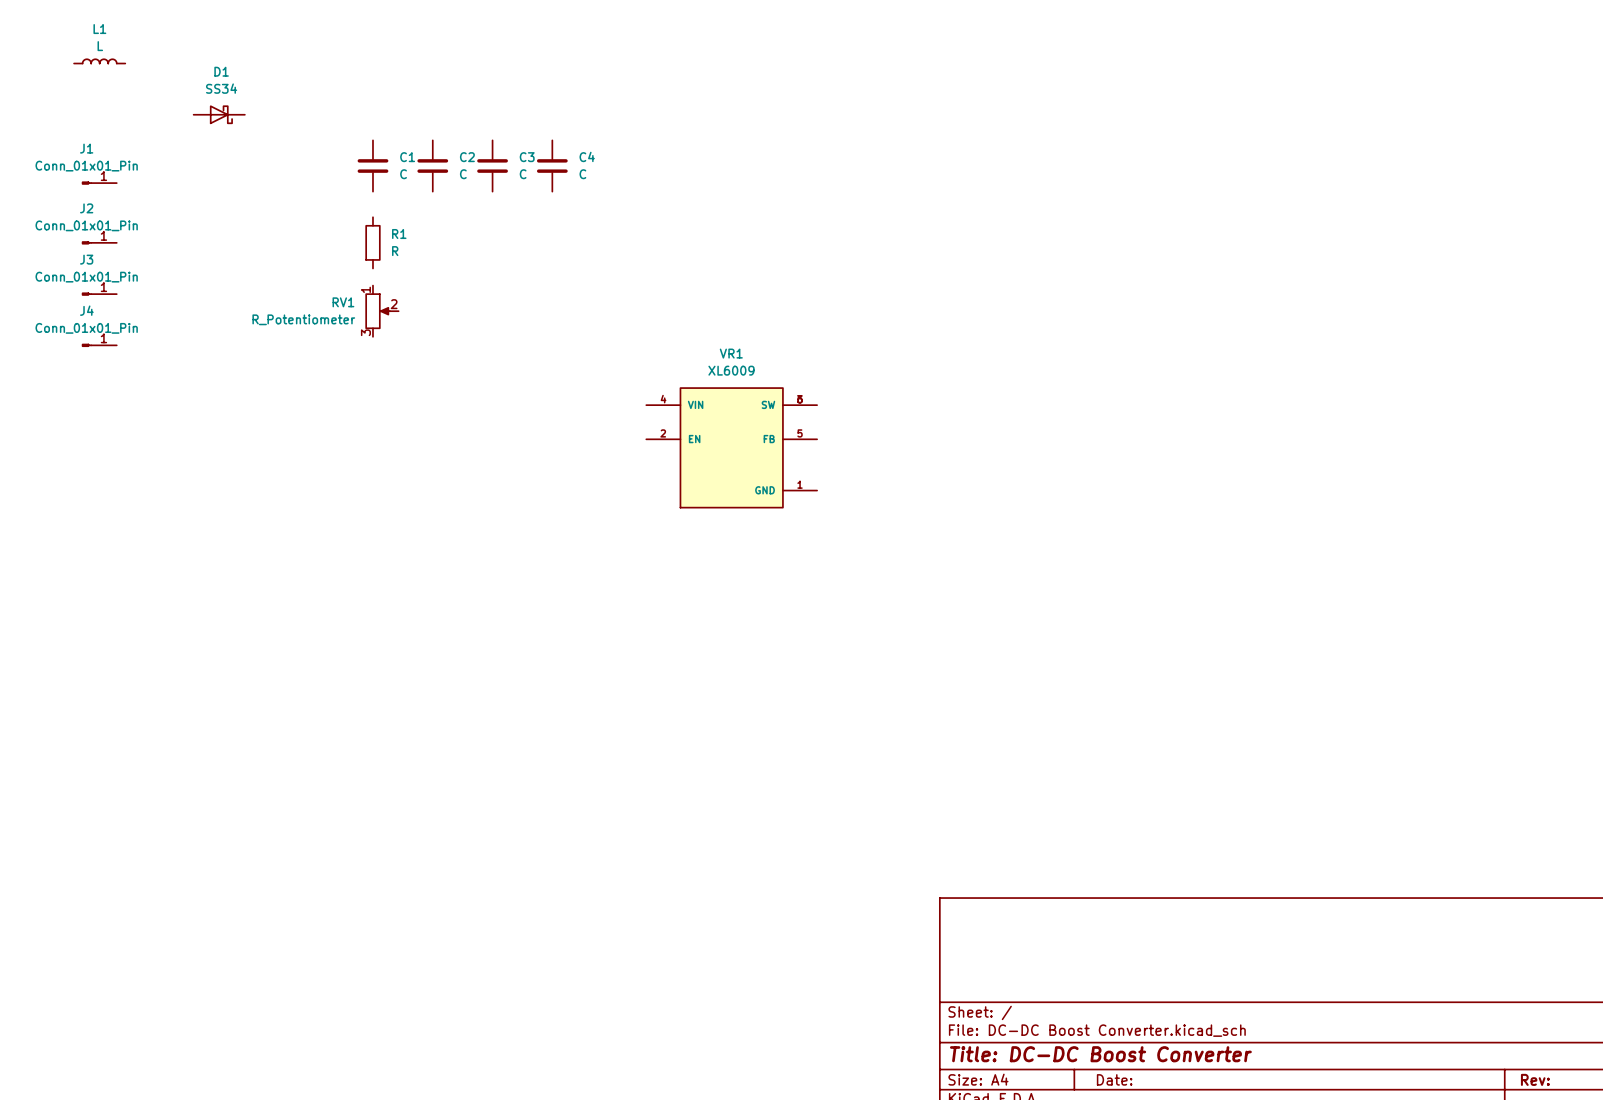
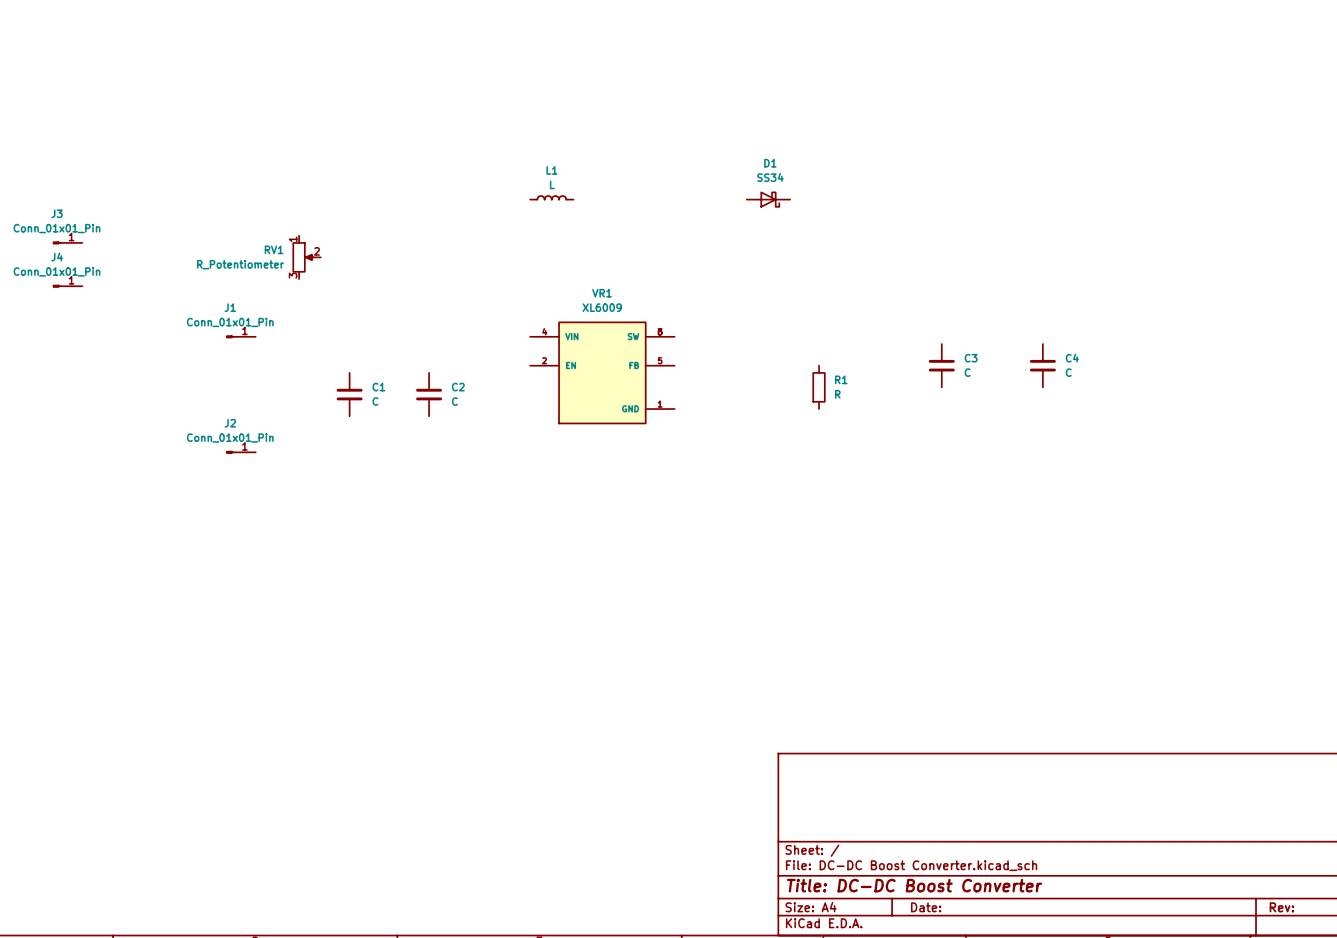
L1 position: (99, 61) -> (551, 197)
D1 position: (219, 114) -> (768, 199)
C1 position: (372, 166) -> (349, 394)
C2 position: (432, 166) -> (429, 394)
C3 position: (492, 166) -> (941, 365)
C4 position: (552, 166) -> (1042, 365)
J1 position: (99, 183) -> (241, 336)
J2 position: (99, 242) -> (241, 452)
R1 position: (372, 242) -> (819, 387)

